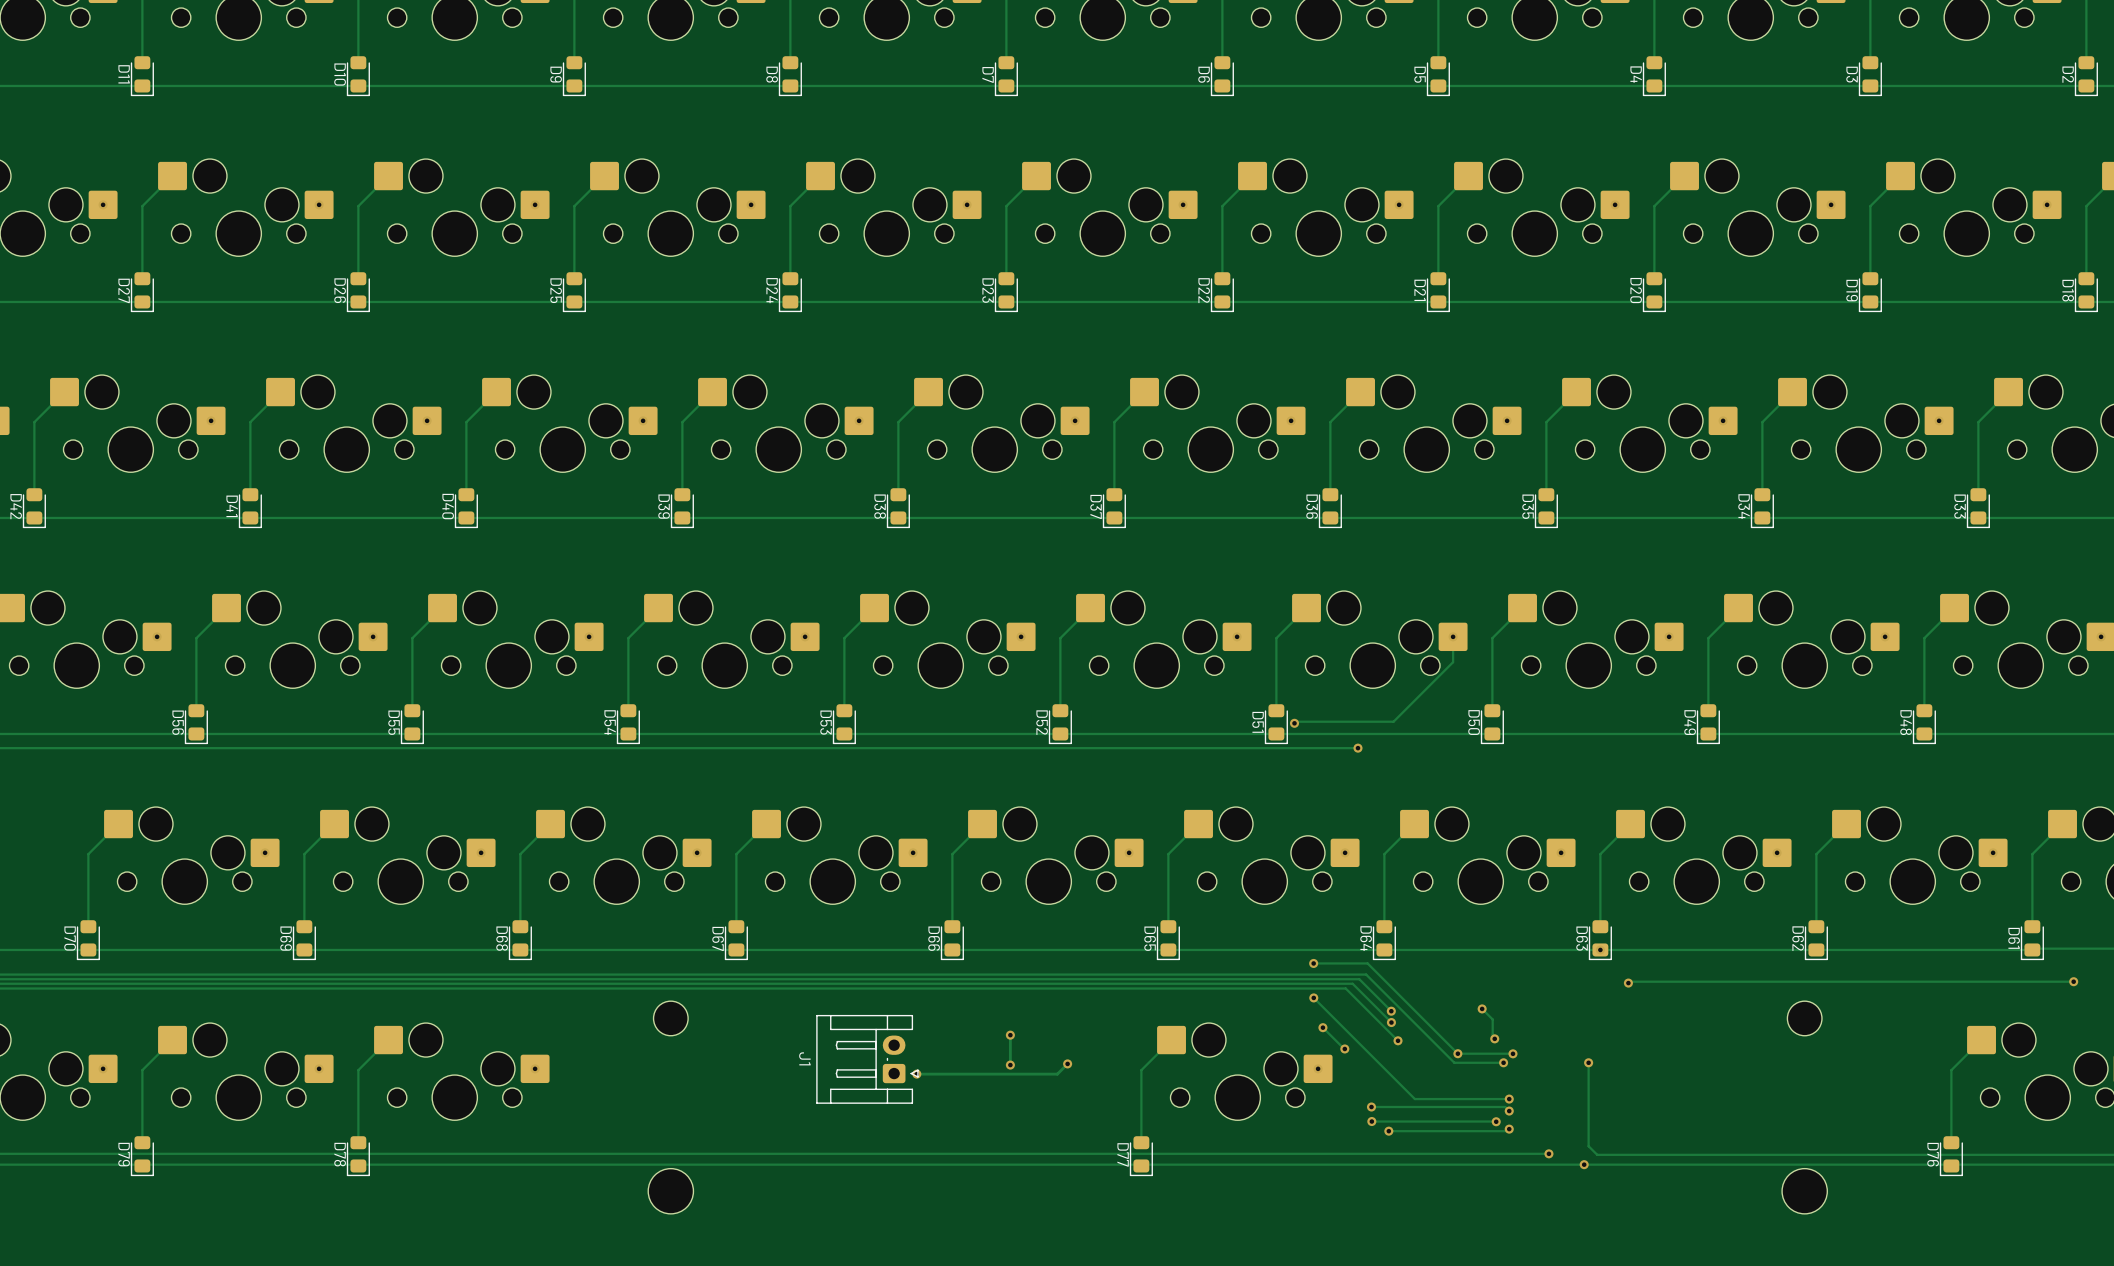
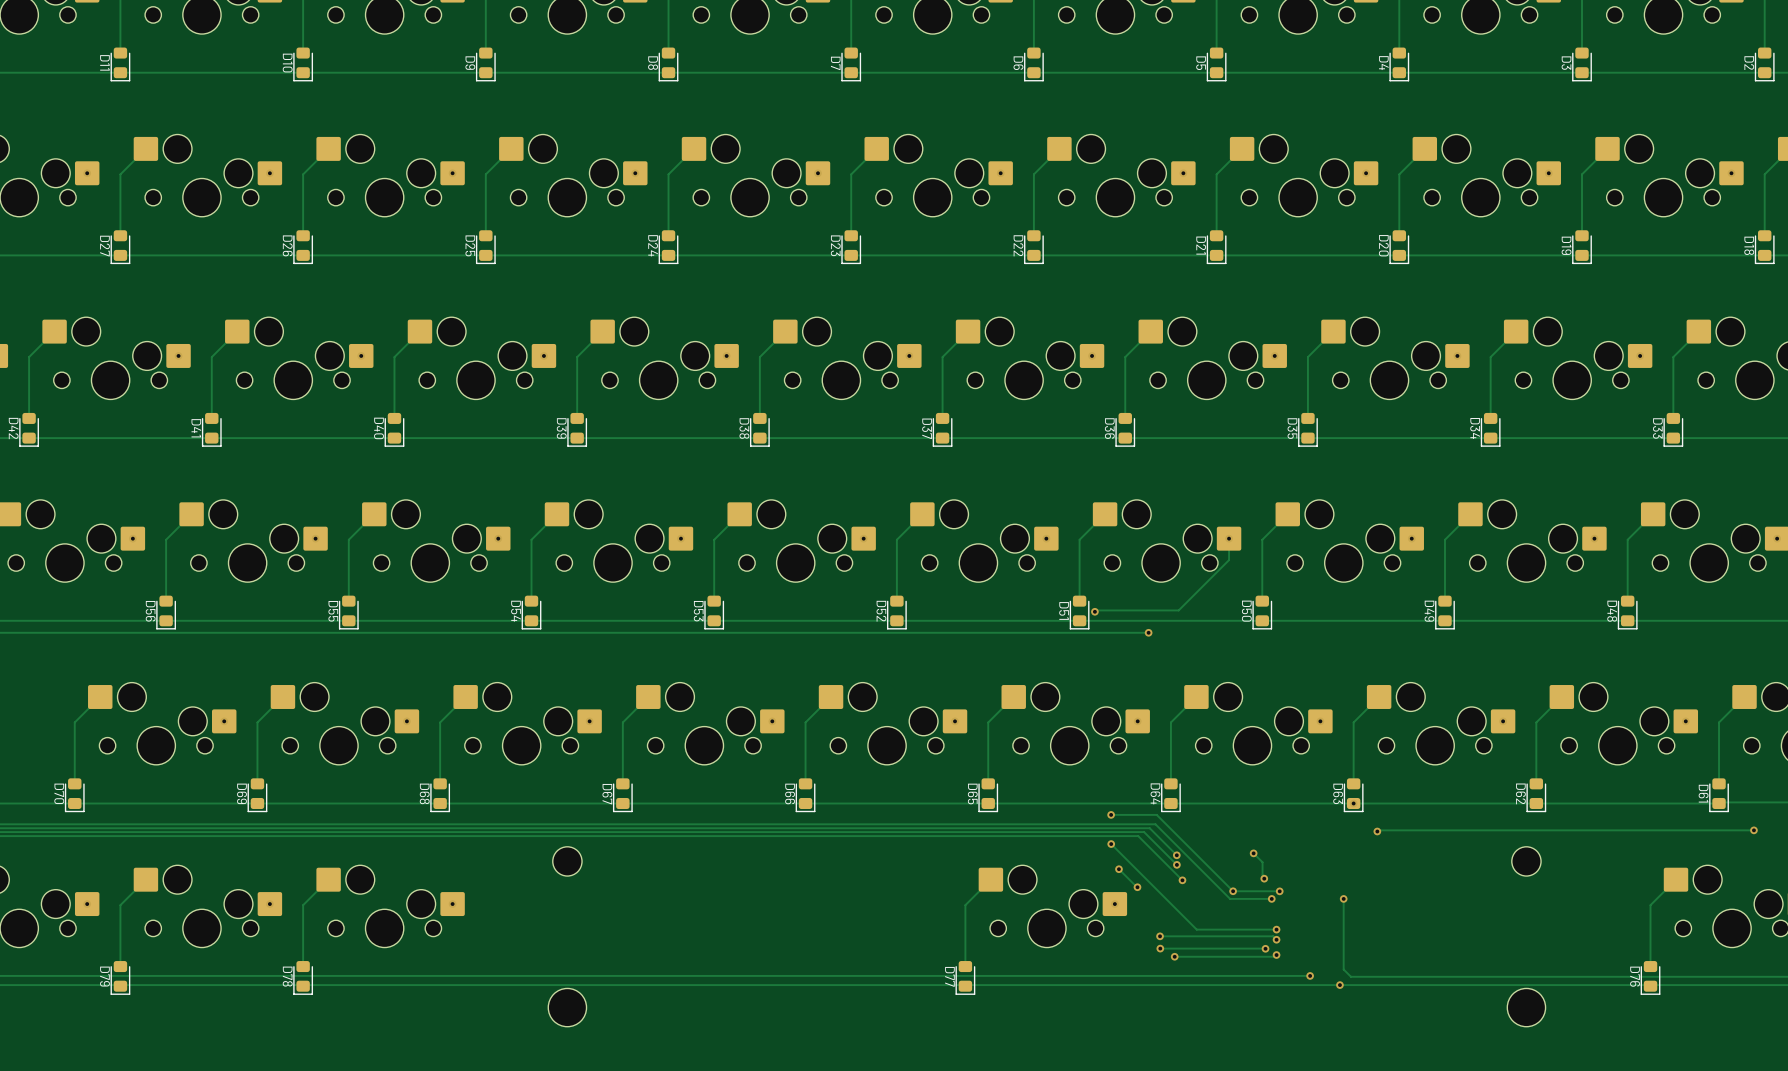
track: (1010, 1035) (1010, 1065) -> none
via: (1010, 1035) -> none
J1: (867, 1059) -> none
track: (1067, 1063) (1057, 1074) (916, 1074) -> none
via: (1067, 1063) -> none
via: (1010, 1065) -> none
via: (916, 1074) -> none

